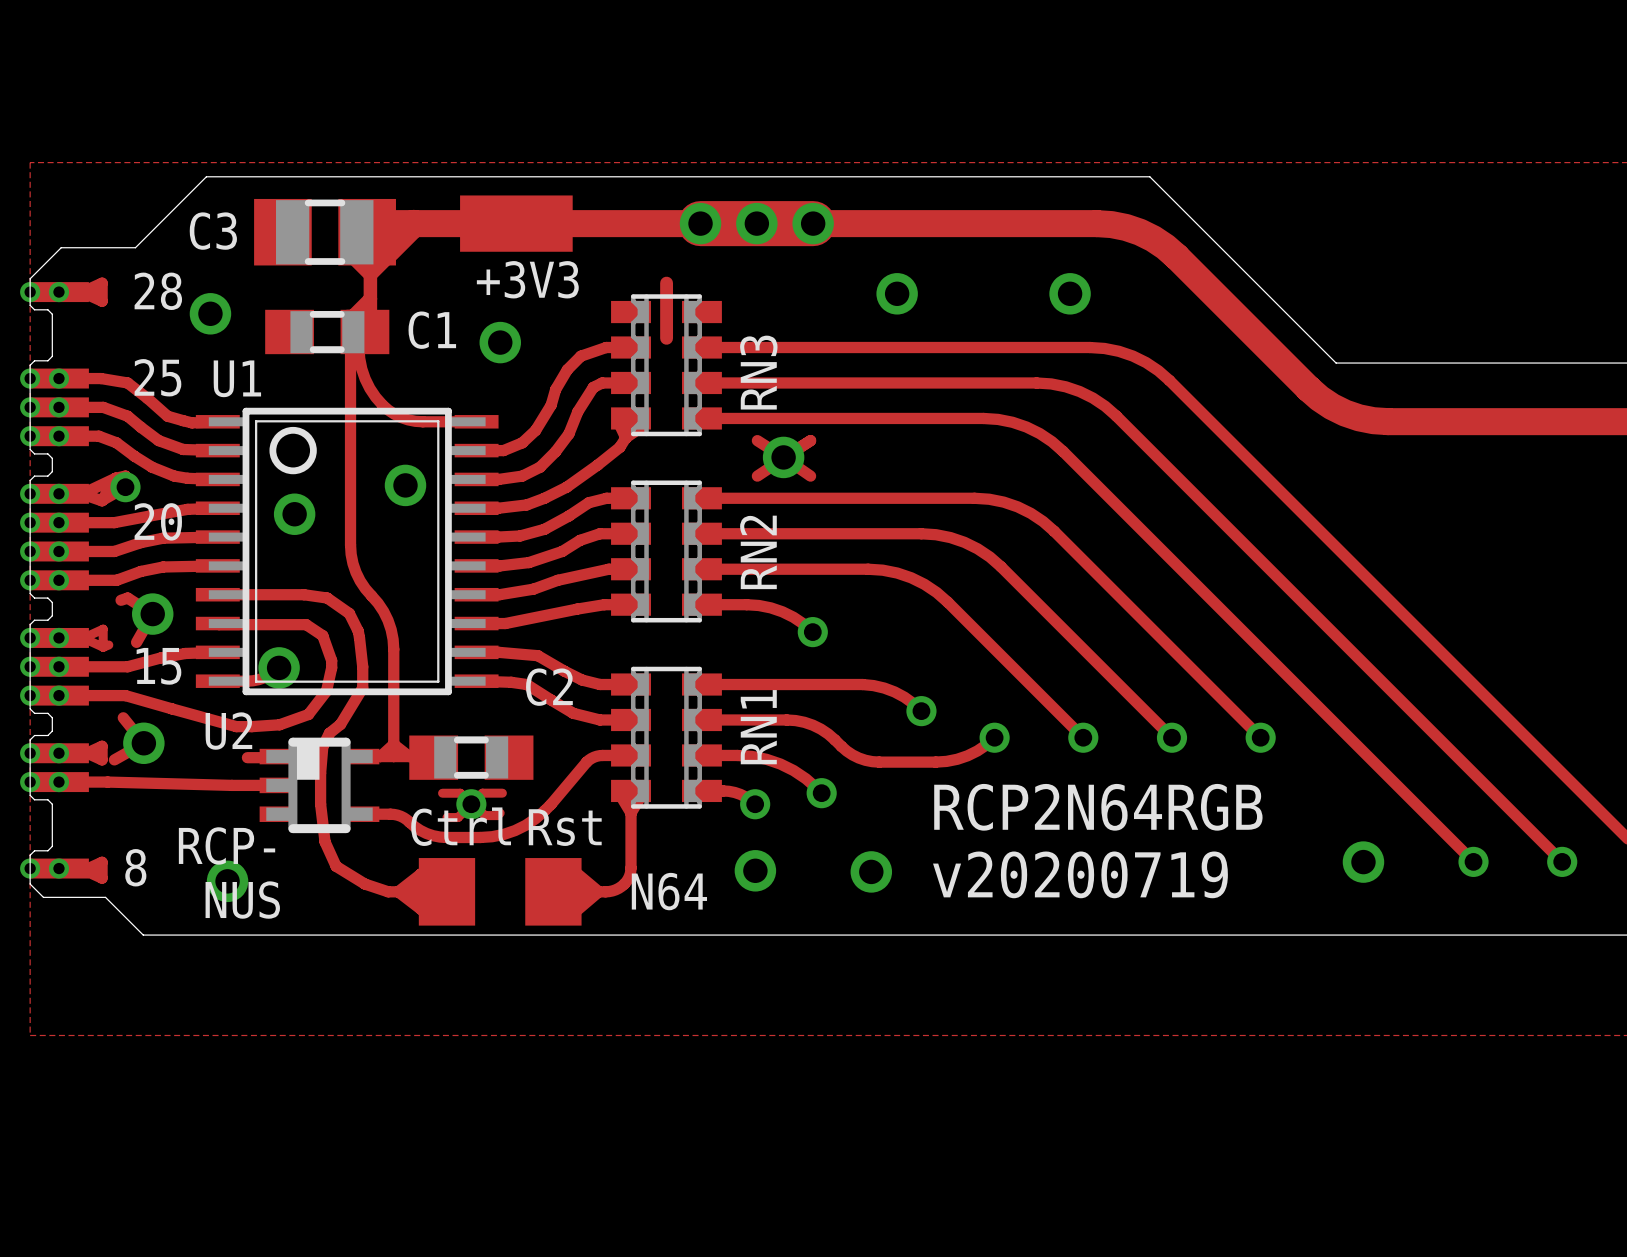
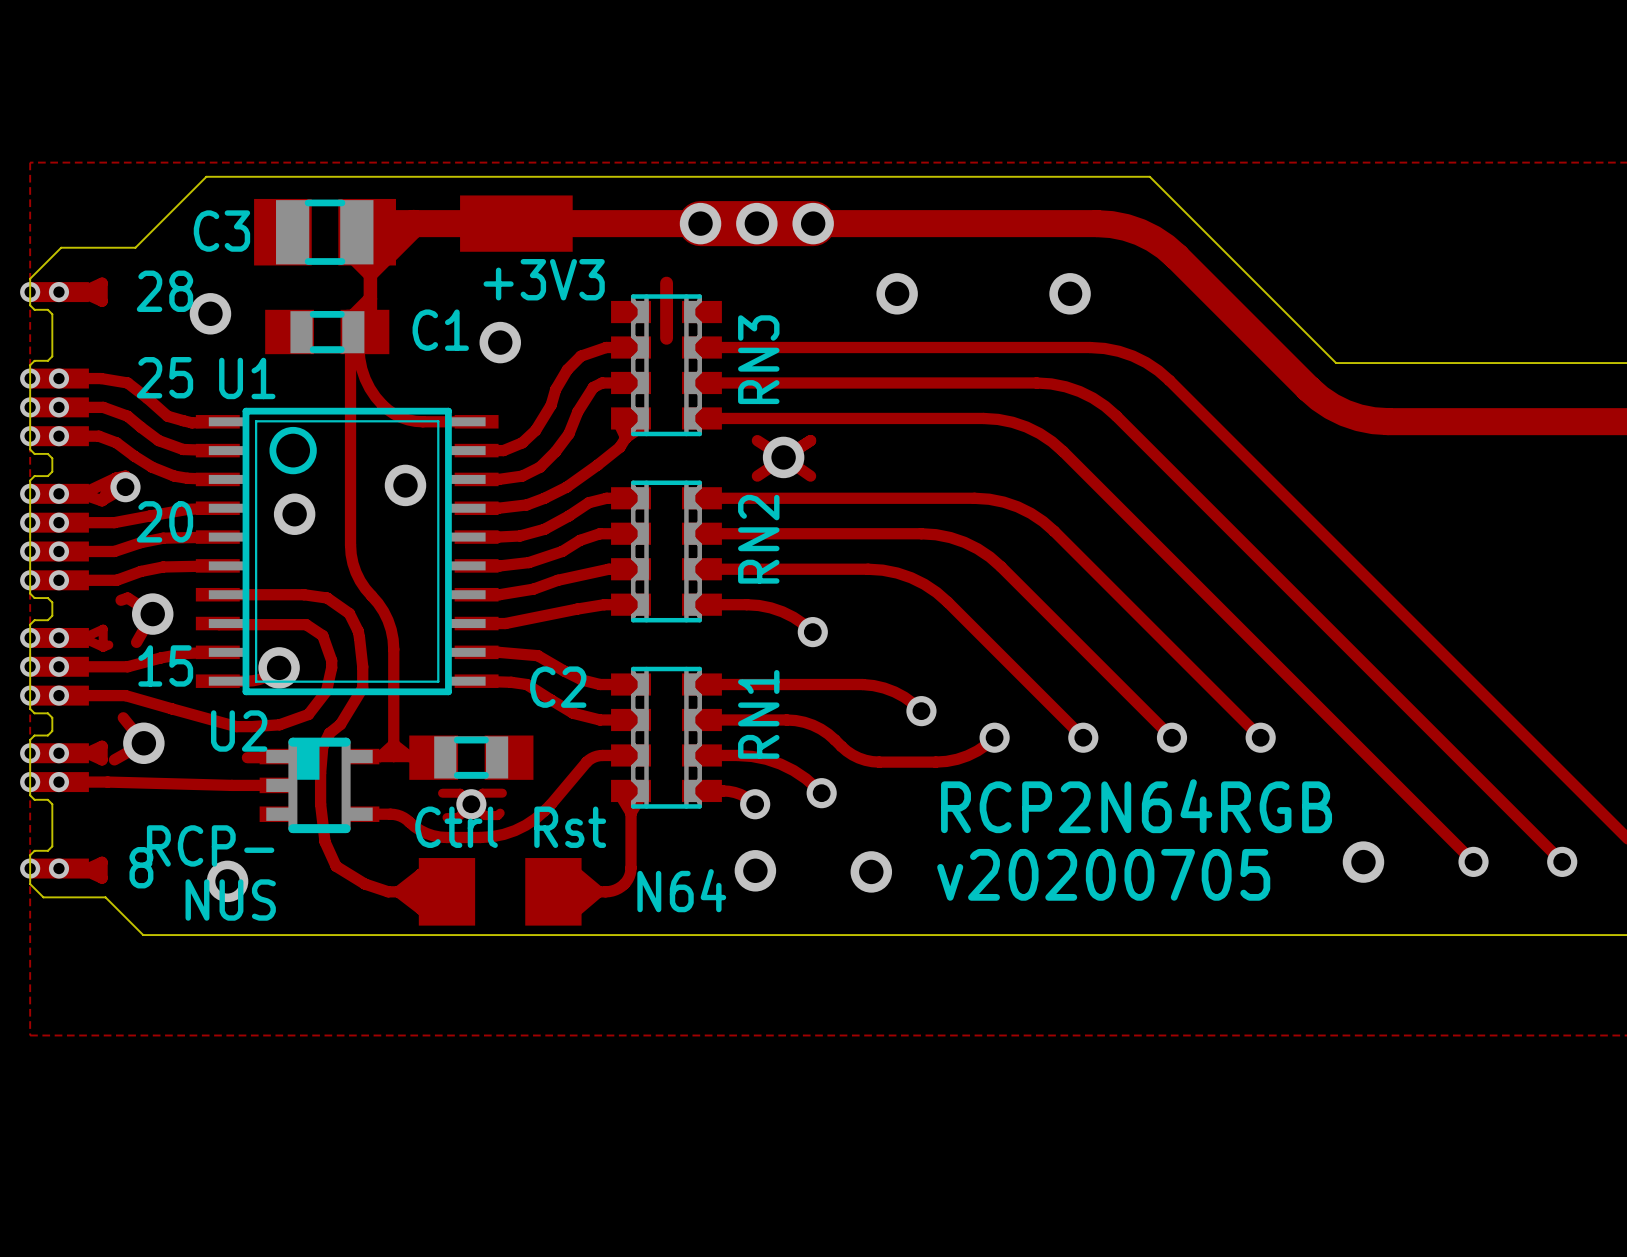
text: v20200719 (1080, 874) -> v20200705 (1103, 874)

